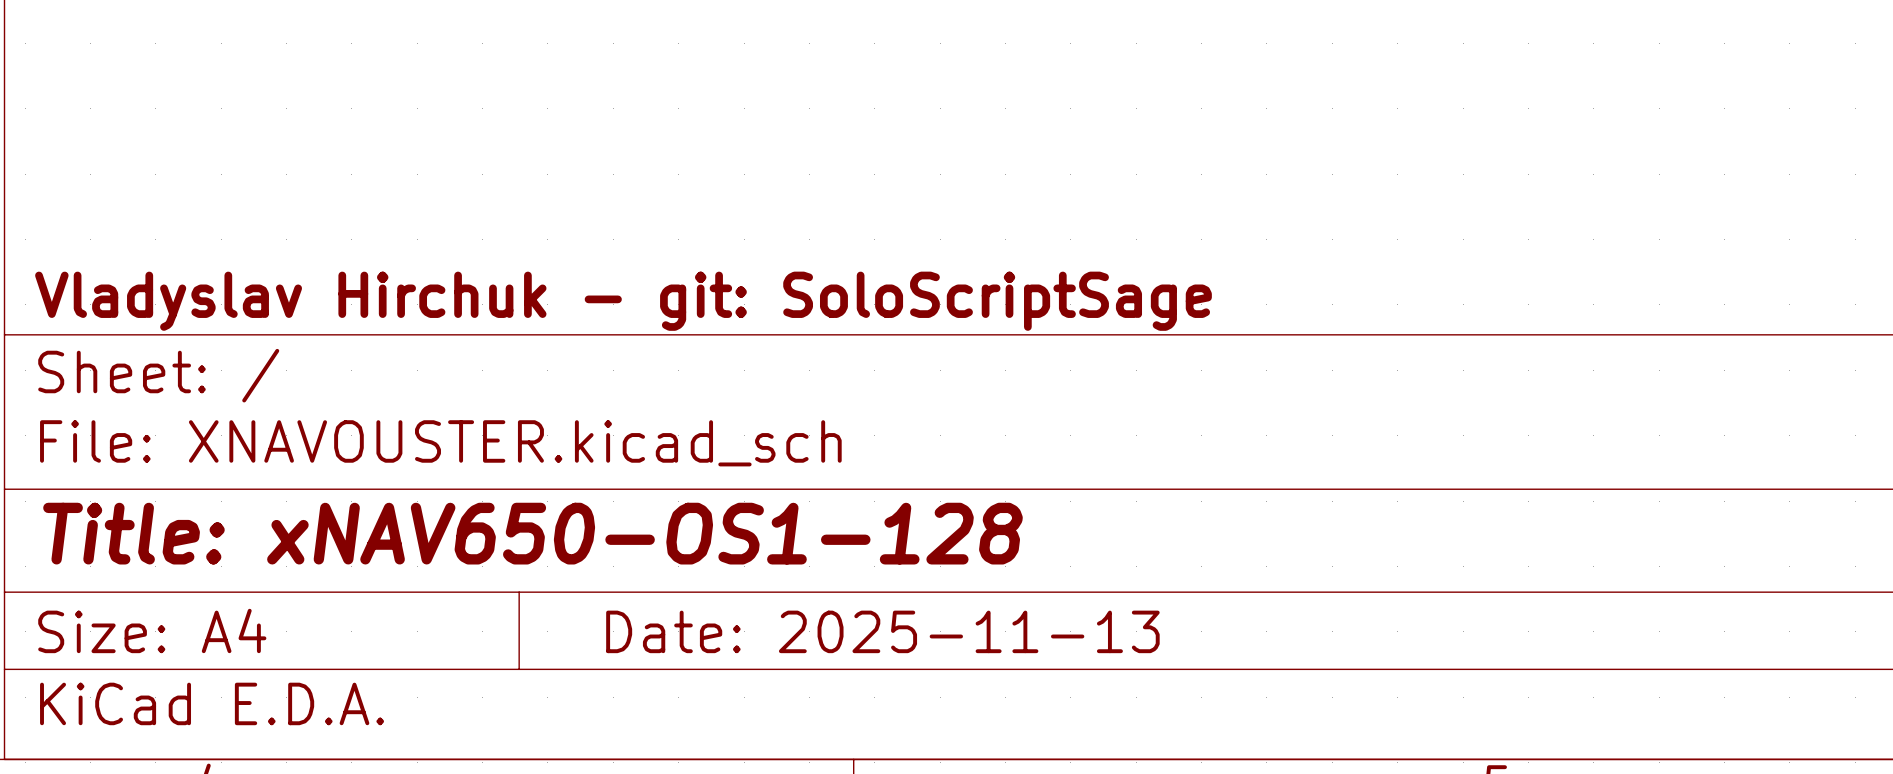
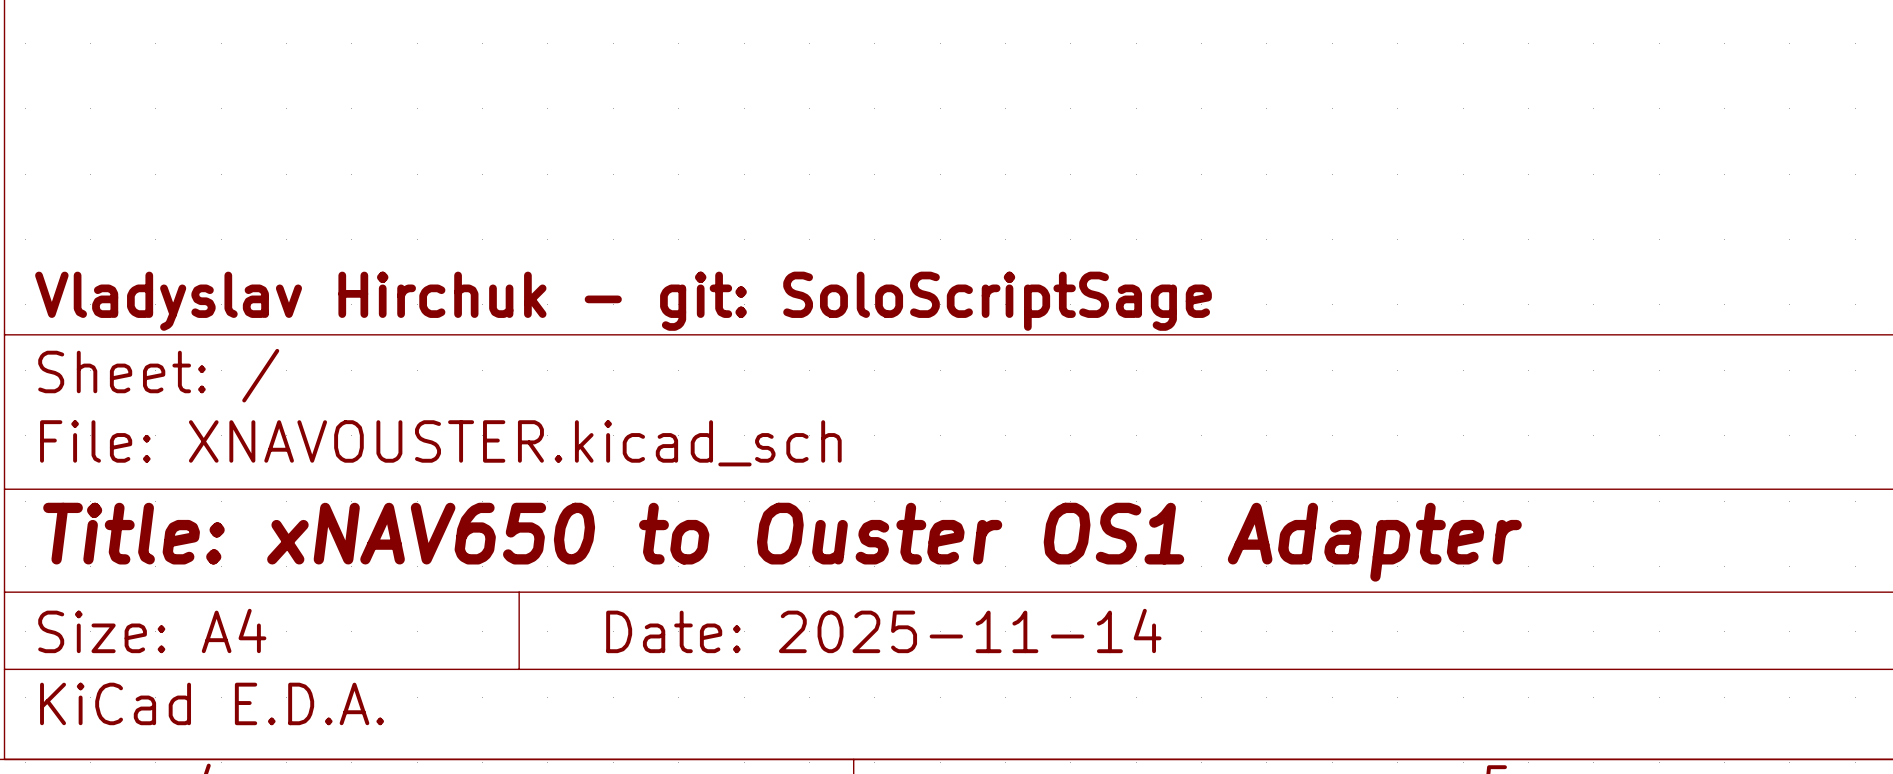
title block: Title: xNAV650-OS1-128 (532, 533) -> Title: xNAV650 to Ouster OS1 Adapter (782, 542)
title block: Date: 2025-11-13 (882, 631) -> Date: 2025-11-14 (883, 630)

